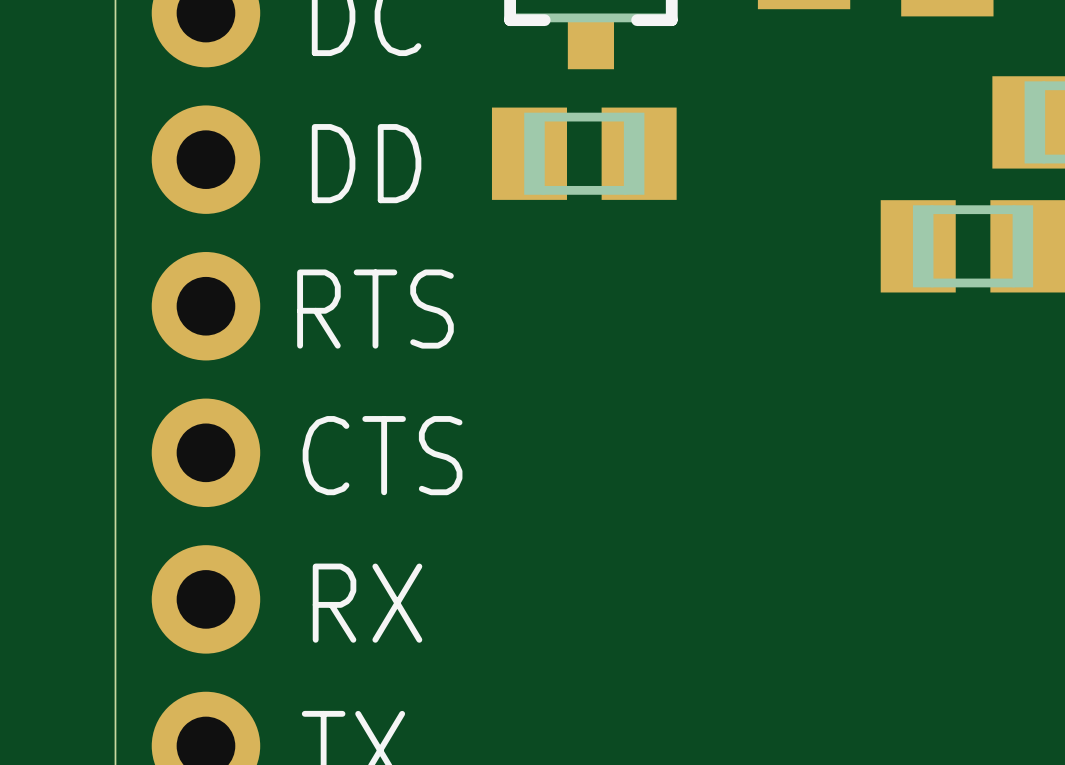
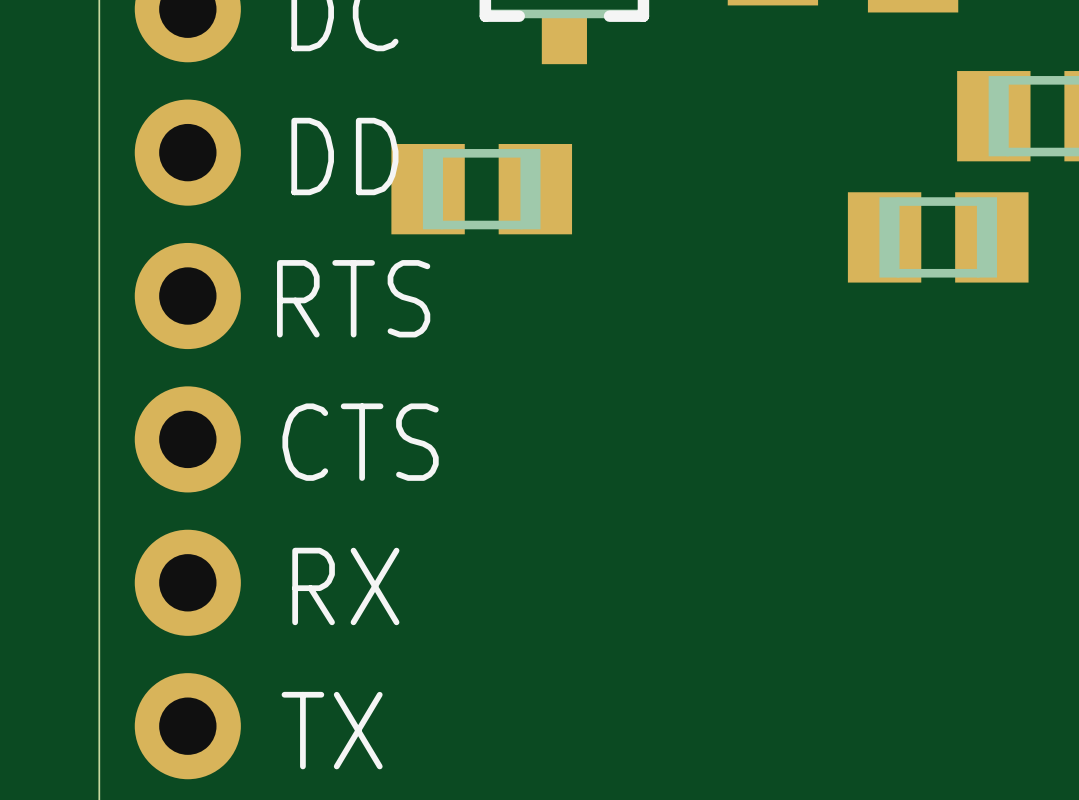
part position: (584, 153) -> (481, 189)

